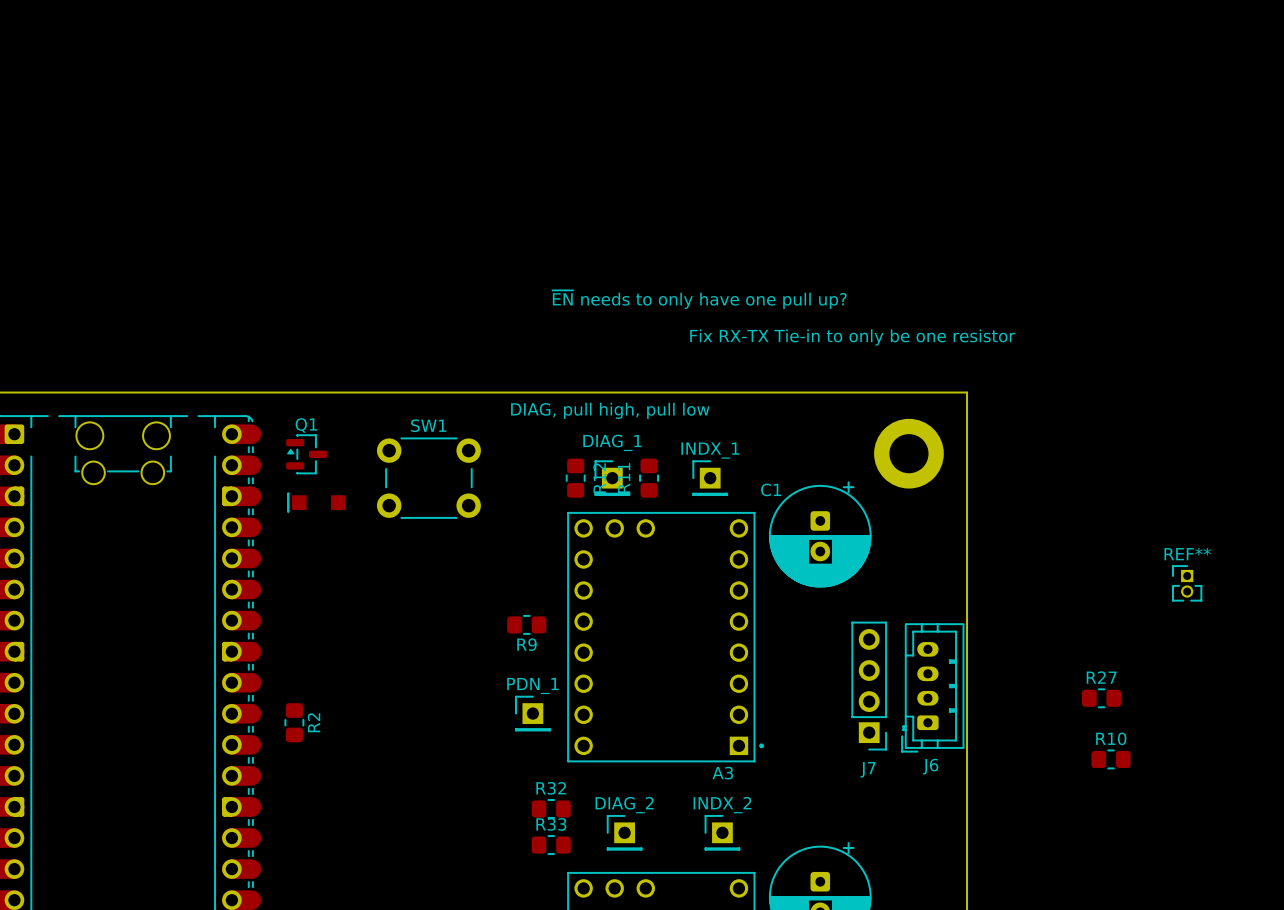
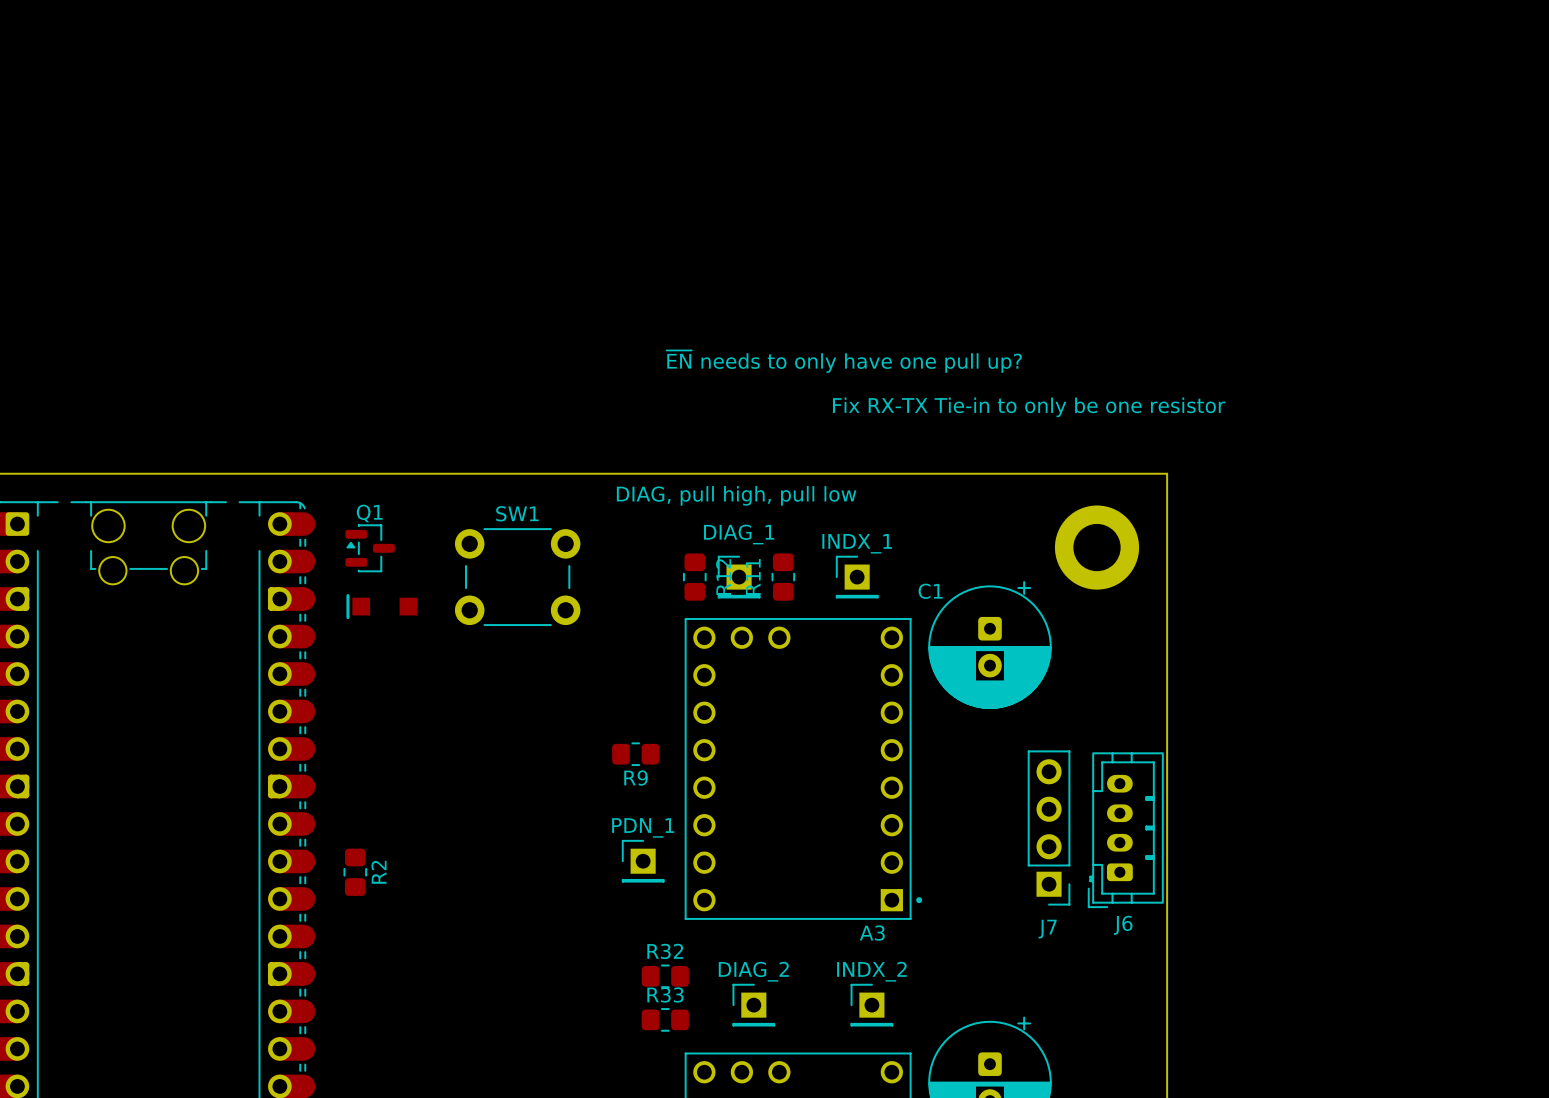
REF**: (1187, 583) -> none
R27: (1101, 698) -> none
R10: (1110, 759) -> none

